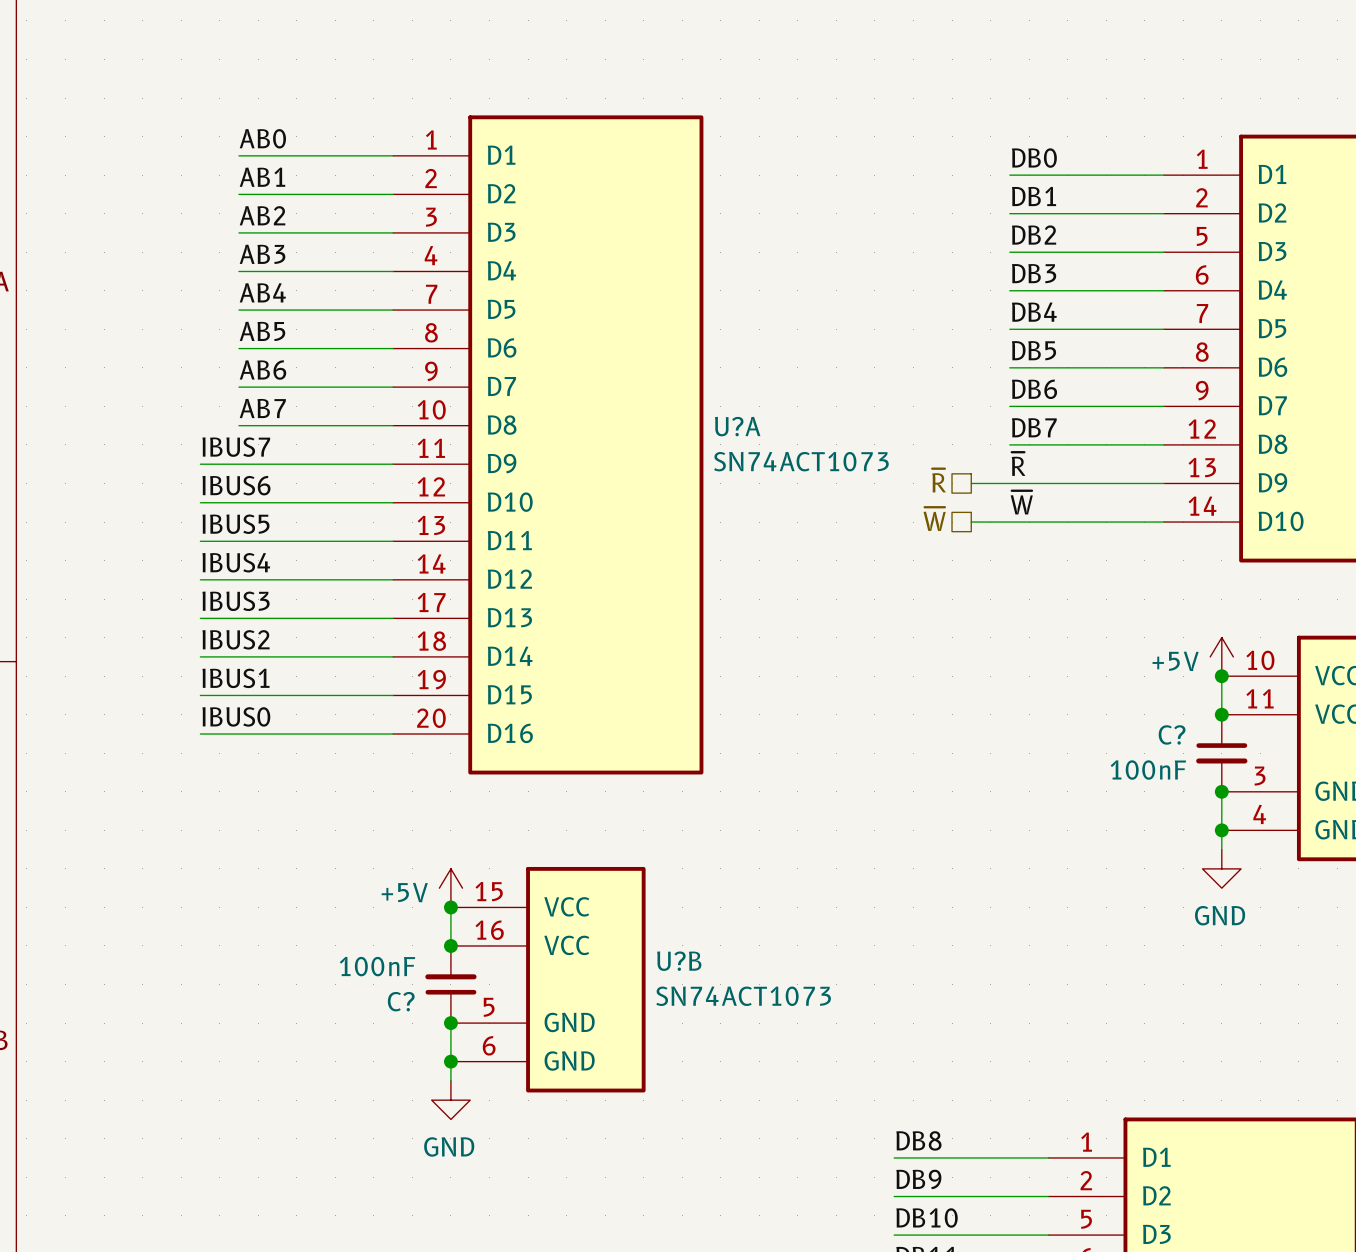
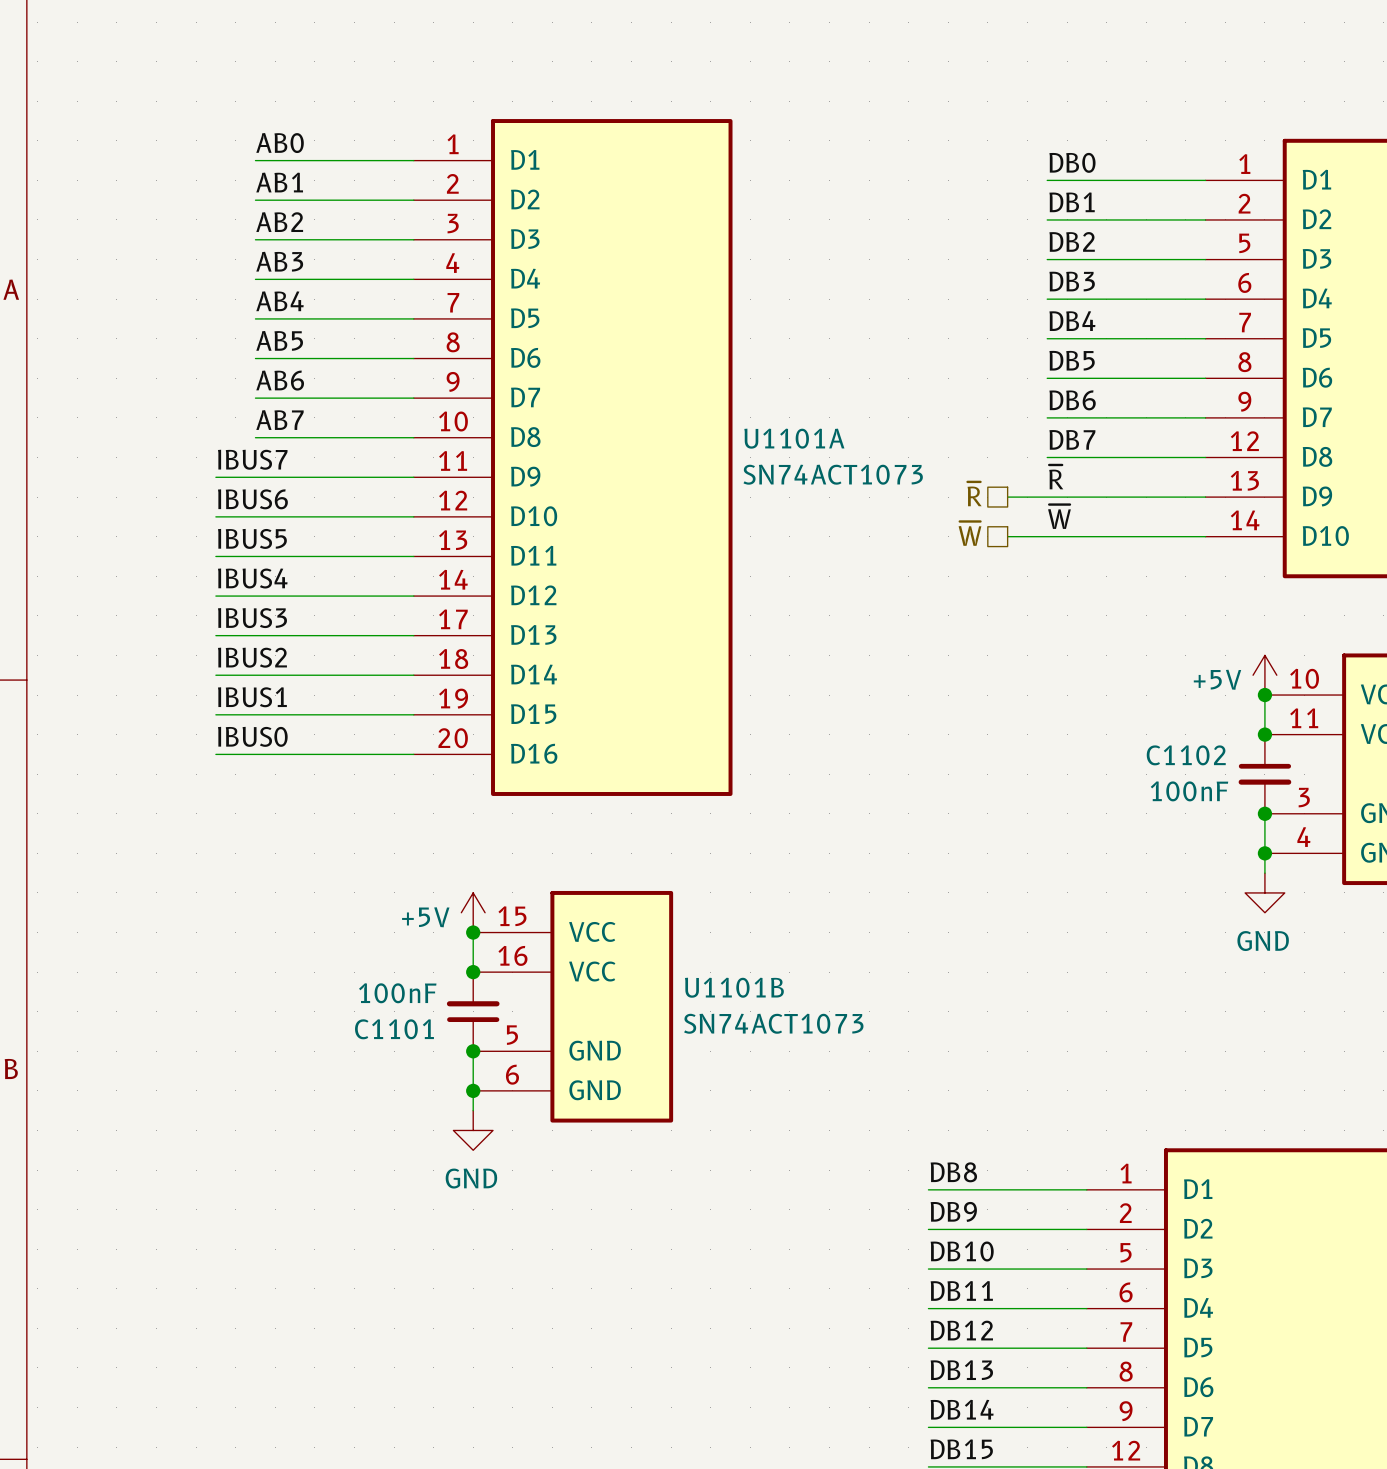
U?A name: U?A (737, 426) -> U1101A (794, 438)
C? name: C? (1172, 734) -> C1102 (1186, 755)
U?B name: U?B (679, 961) -> U1101B (734, 987)
C? name: C? (401, 1001) -> C1101 (394, 1029)

